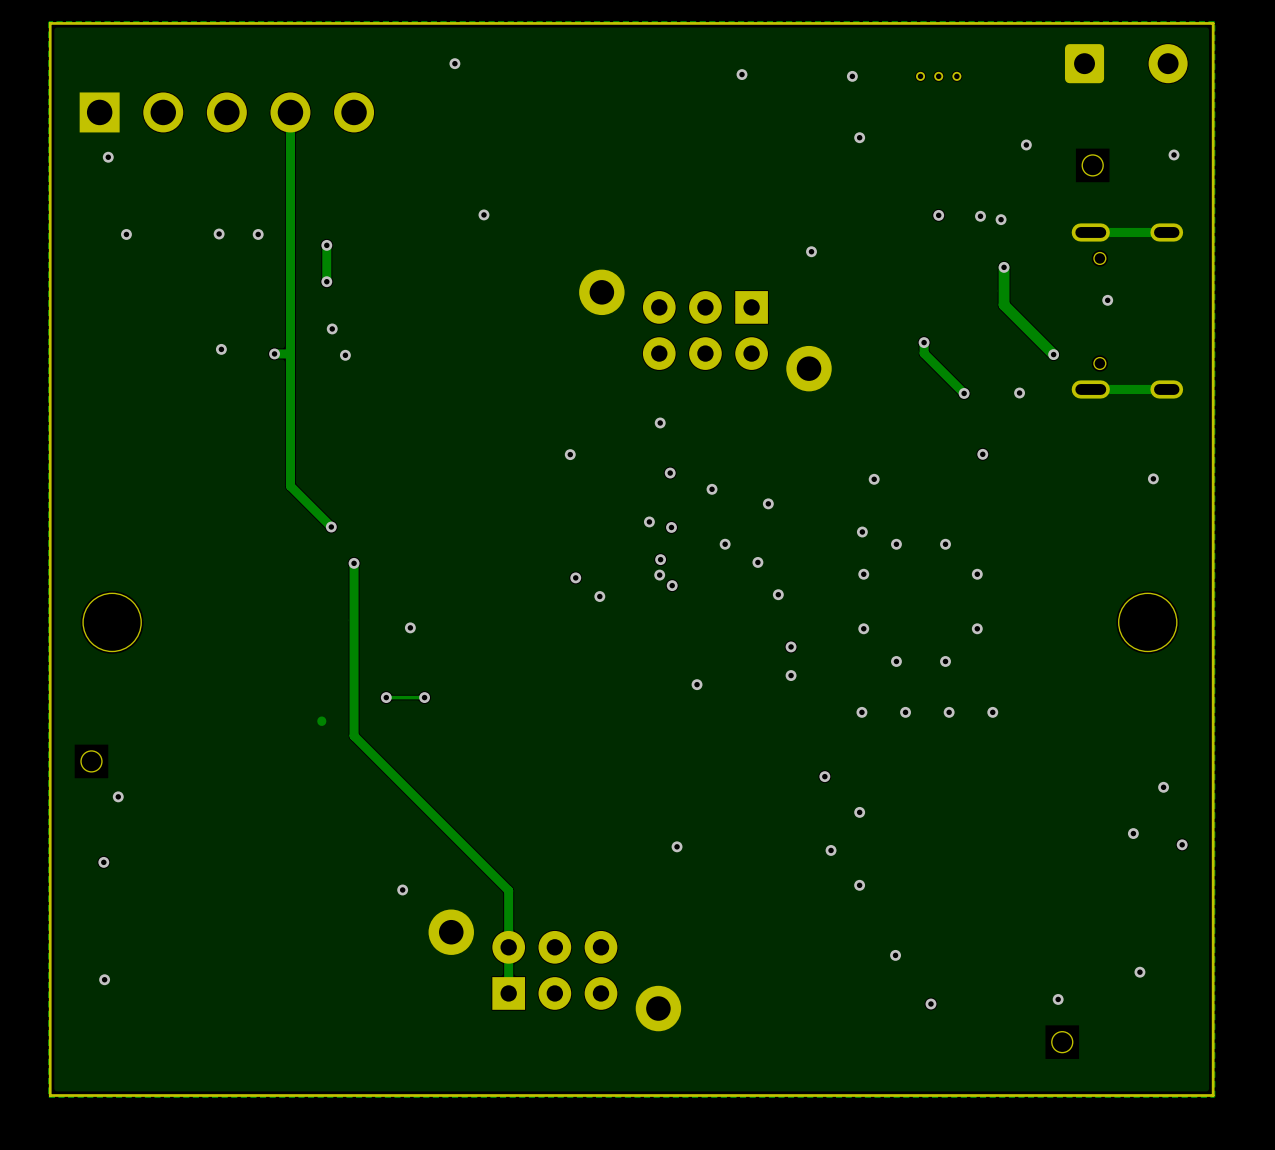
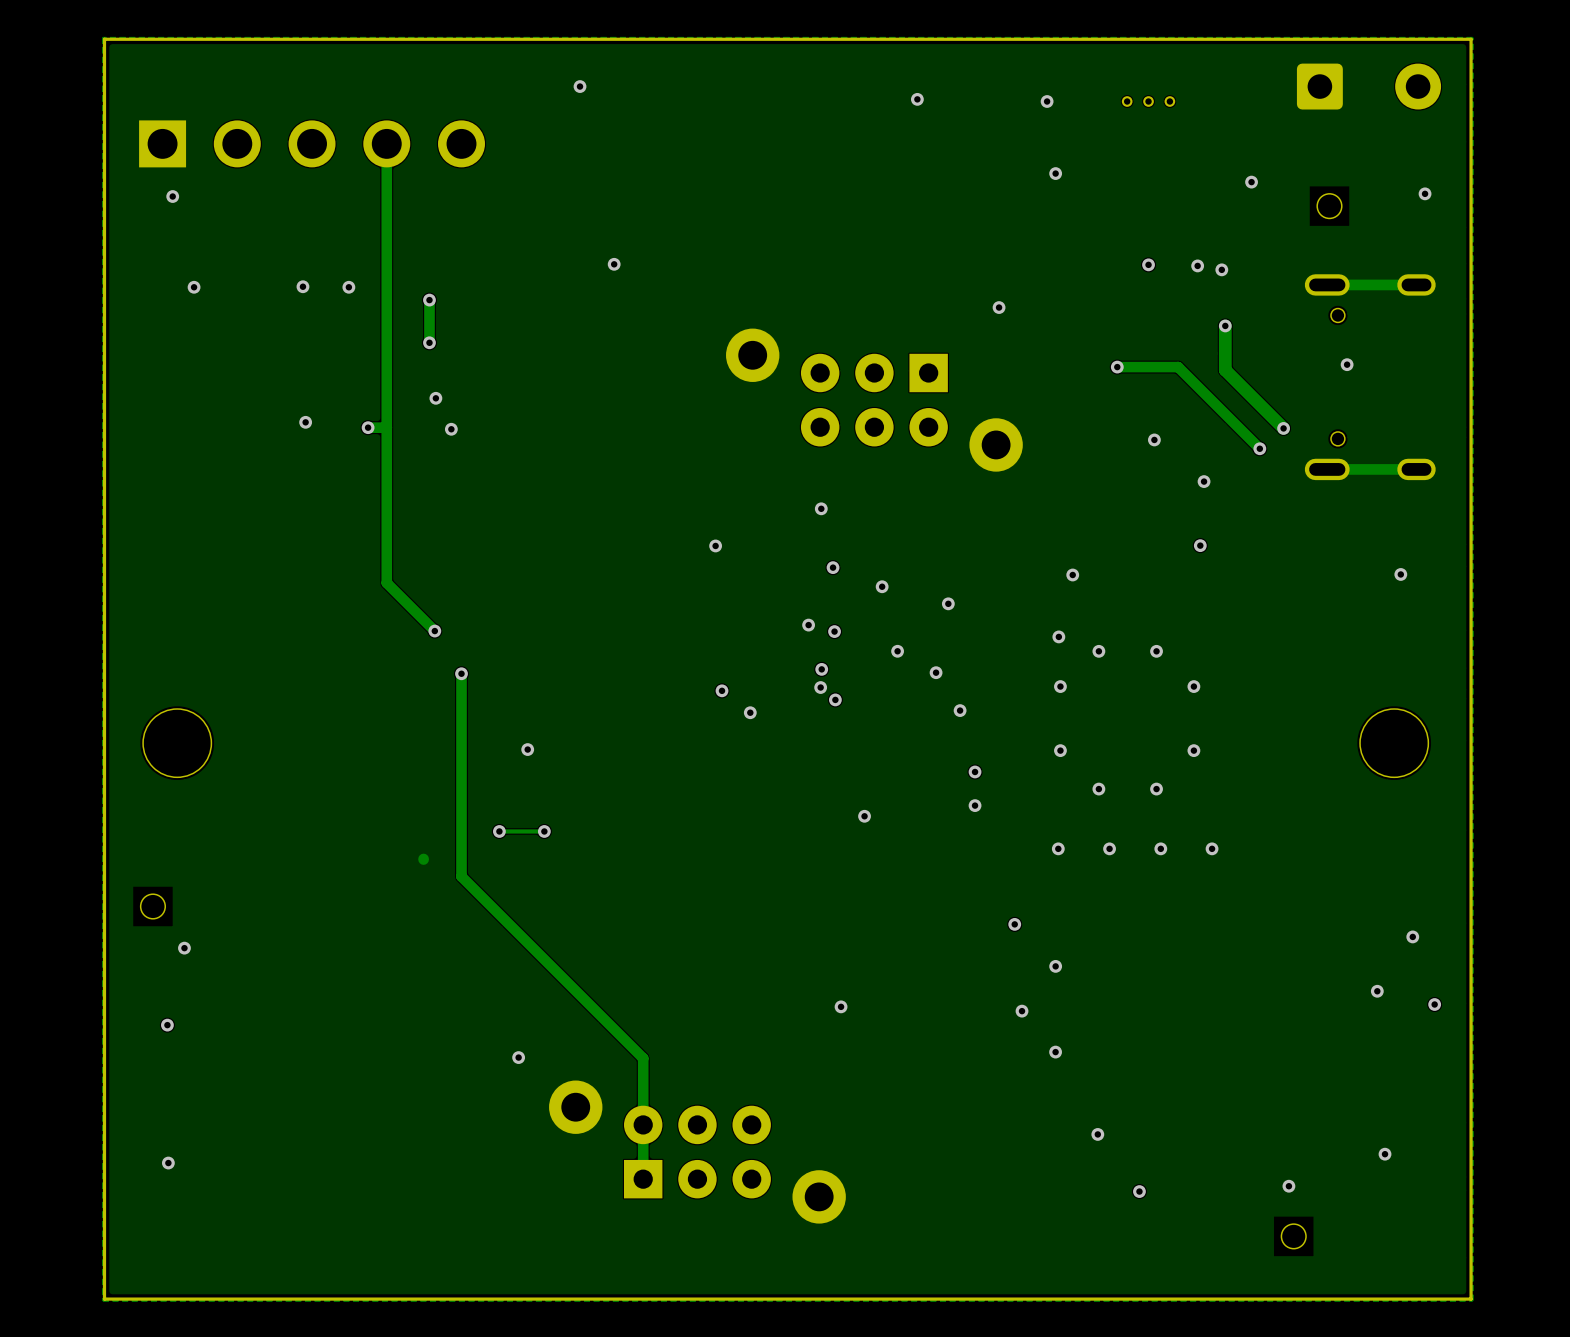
track: none -> (1117, 367) (1178, 367) (1259, 448)
via: none -> (1117, 367)
track: (924, 342) (924, 353) (964, 393) -> none
via: (924, 342) -> none
via: none -> (1154, 439)
via: none -> (1259, 448)
via: (964, 393) -> none
via: (1019, 393) -> none
via: none -> (1204, 481)

